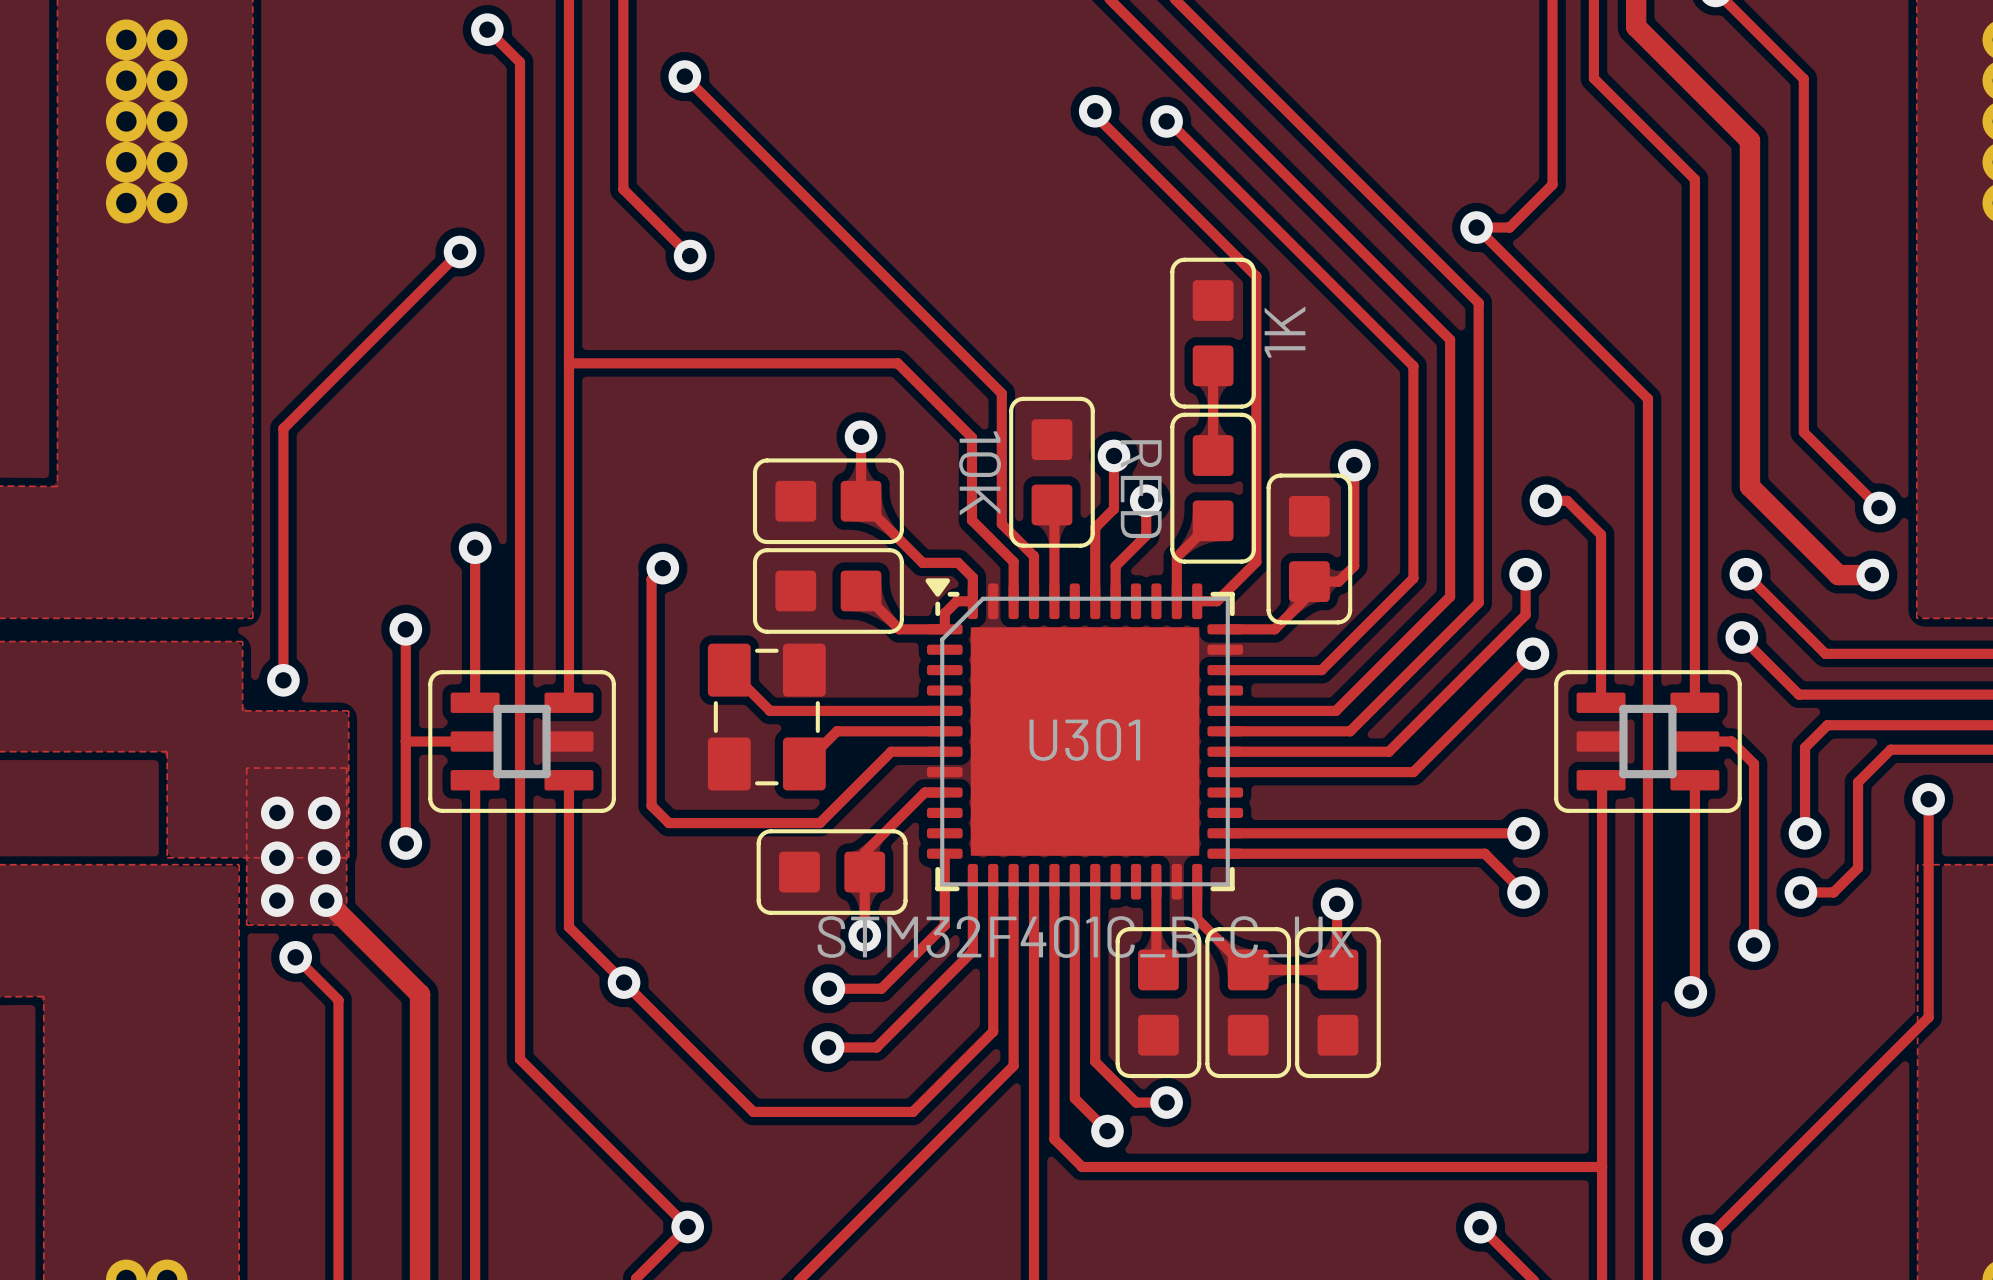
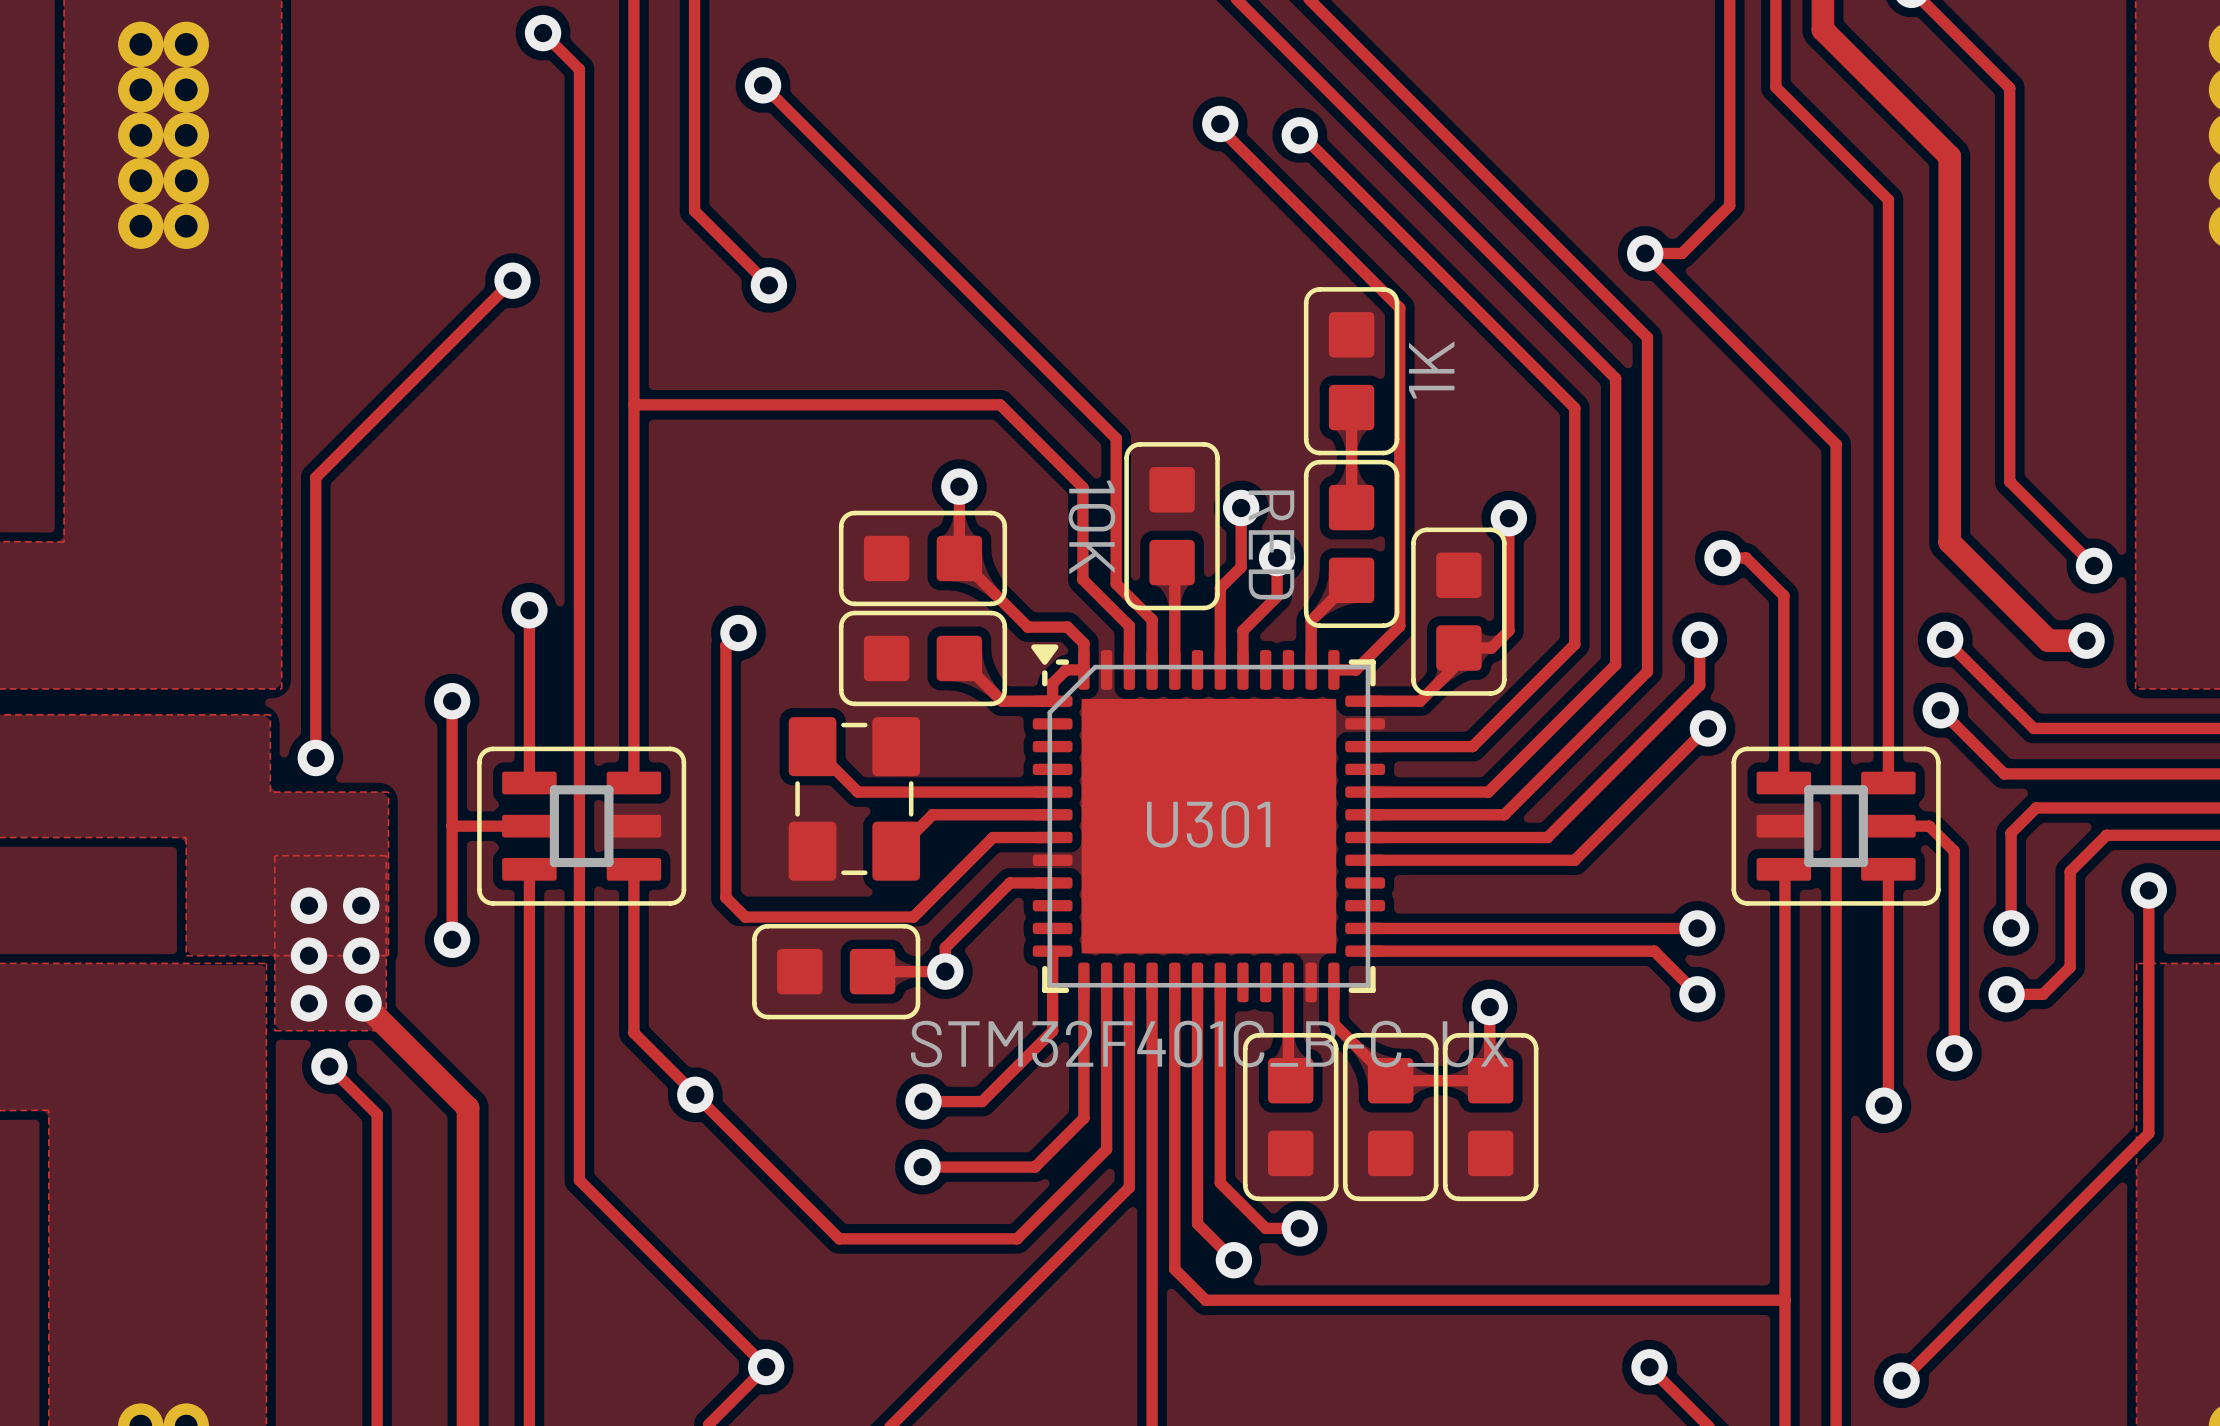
track: (924, 792) (864, 852) (864, 935) -> (1030, 882) (1010, 882) (945, 947) (945, 971) (872, 971)
part position: (832, 872) -> (836, 971)
via position: (864, 935) -> (945, 971)
track: (972, 951) (876, 1047) -> (1083, 1059) (1083, 1118) (1035, 1167) (976, 1167)

